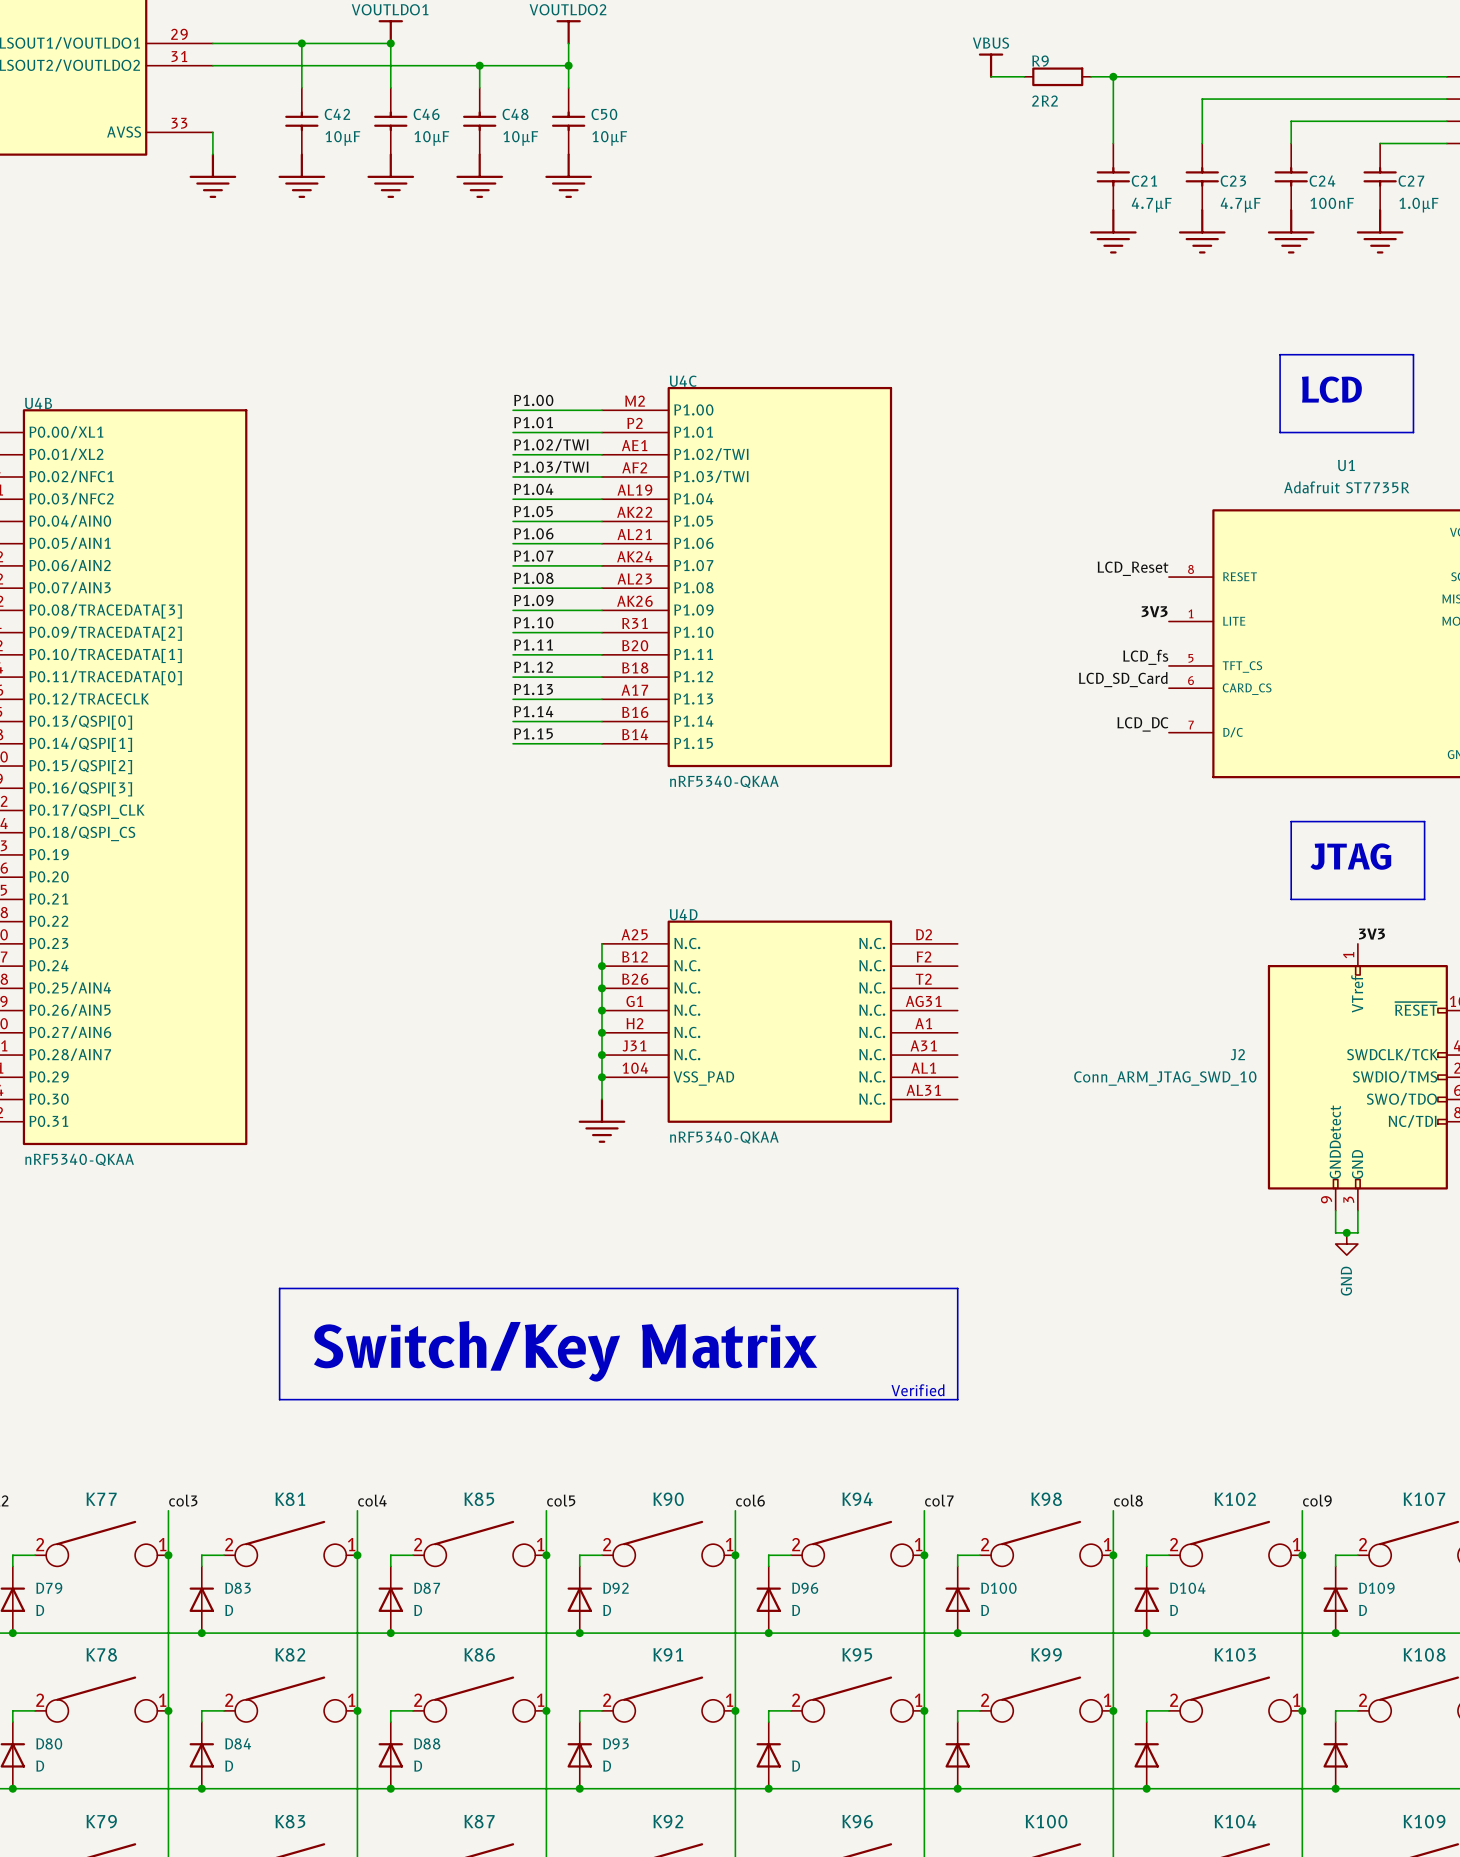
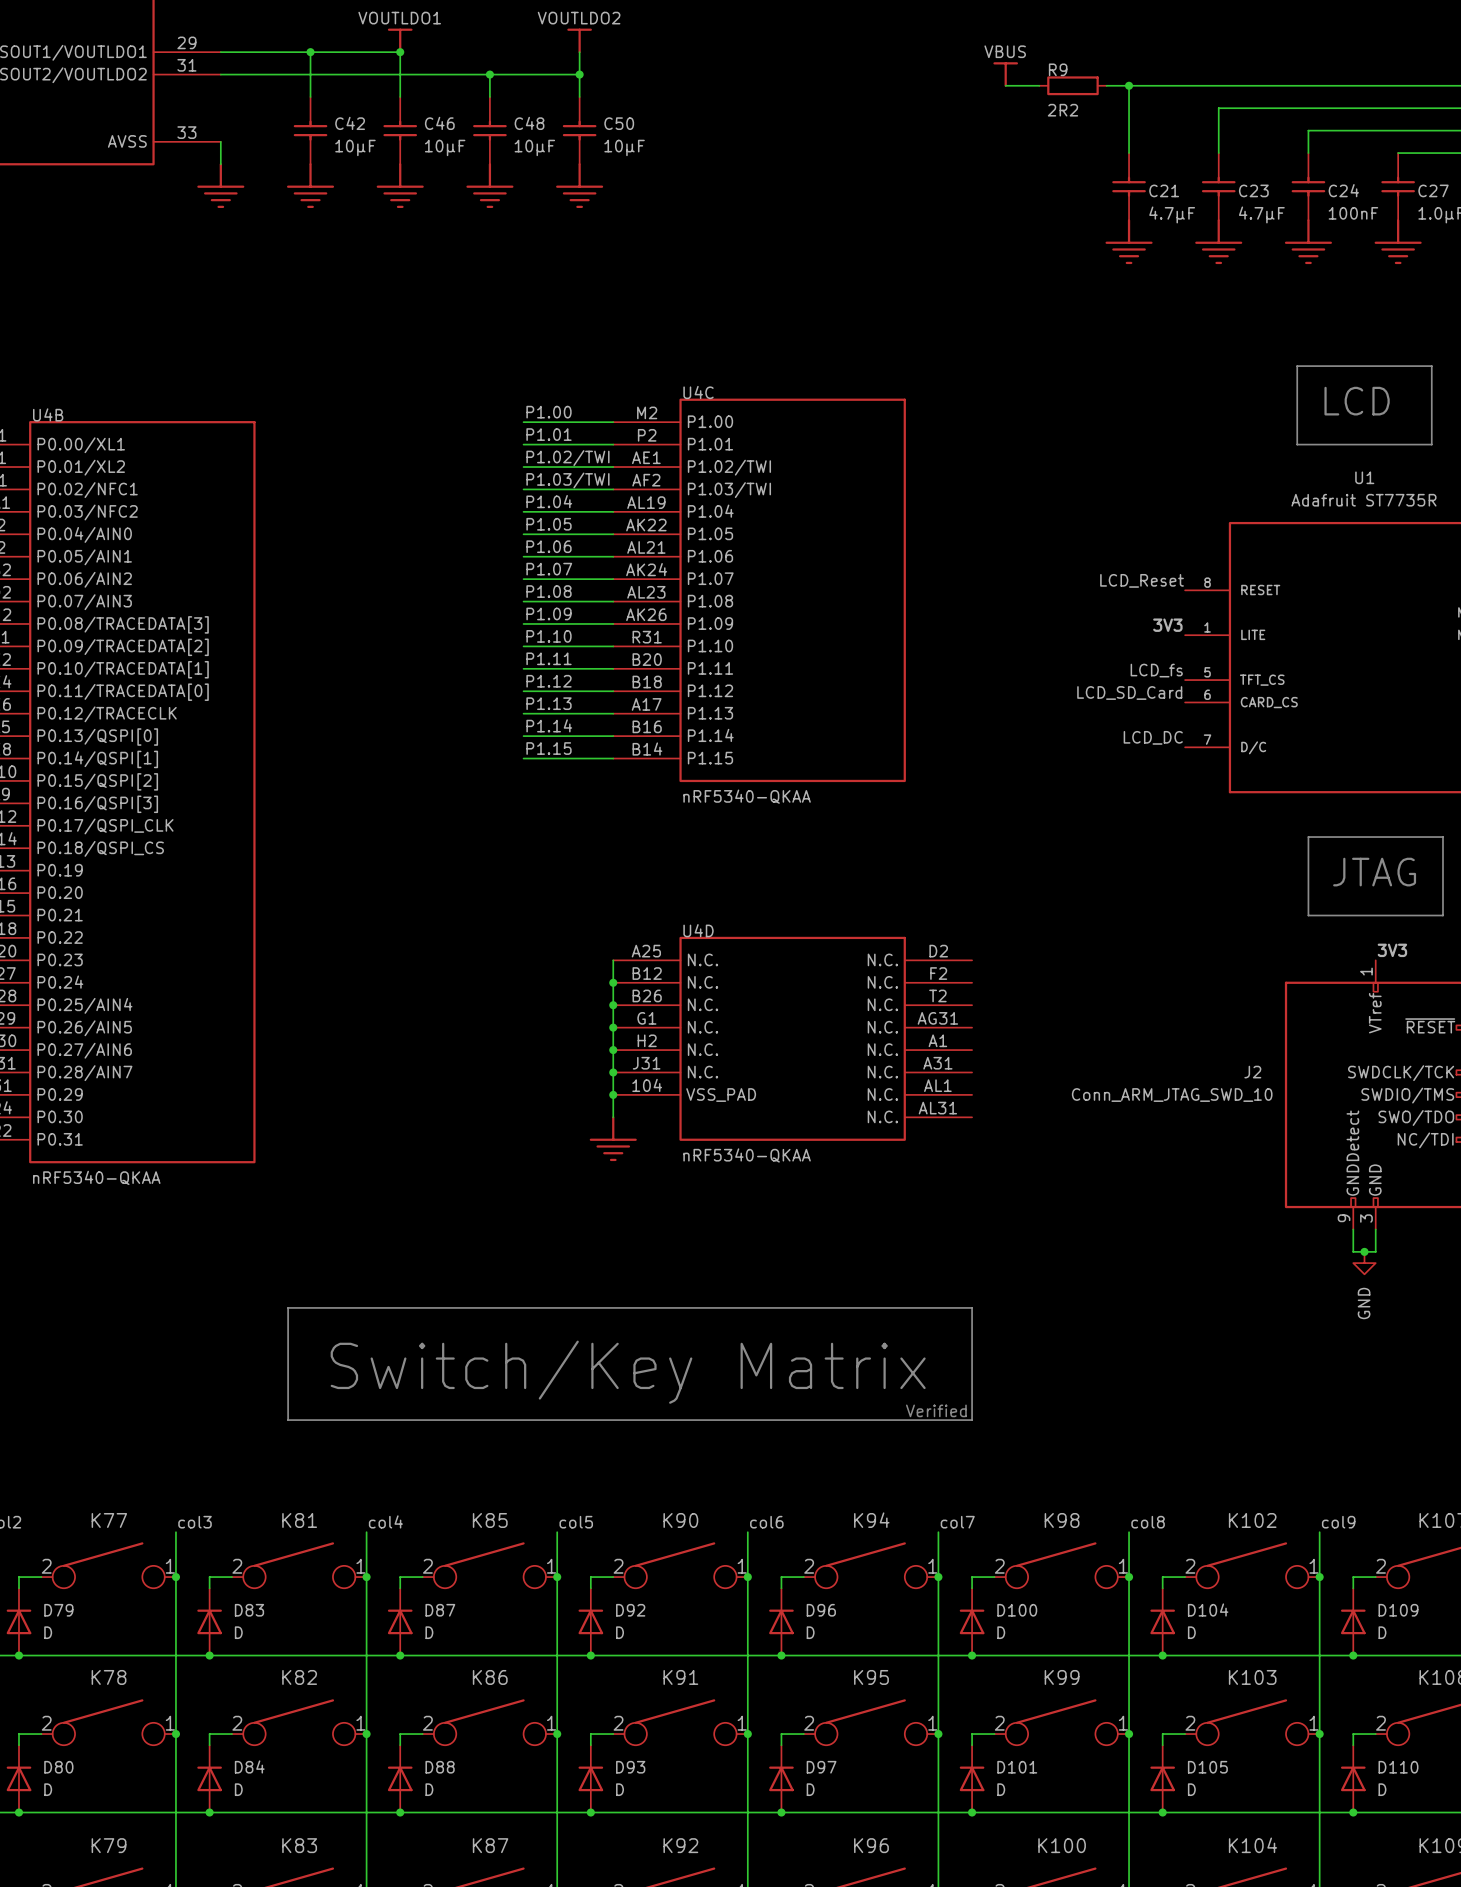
D97 name: none -> D97 (821, 1767)
D101 name: none -> D101 (1017, 1767)
D105 name: none -> D105 (1207, 1767)
D110 name: none -> D110 (1398, 1767)
D101 value: none -> D (1001, 1789)
D105 value: none -> D (1191, 1789)
D110 value: none -> D (1382, 1789)

